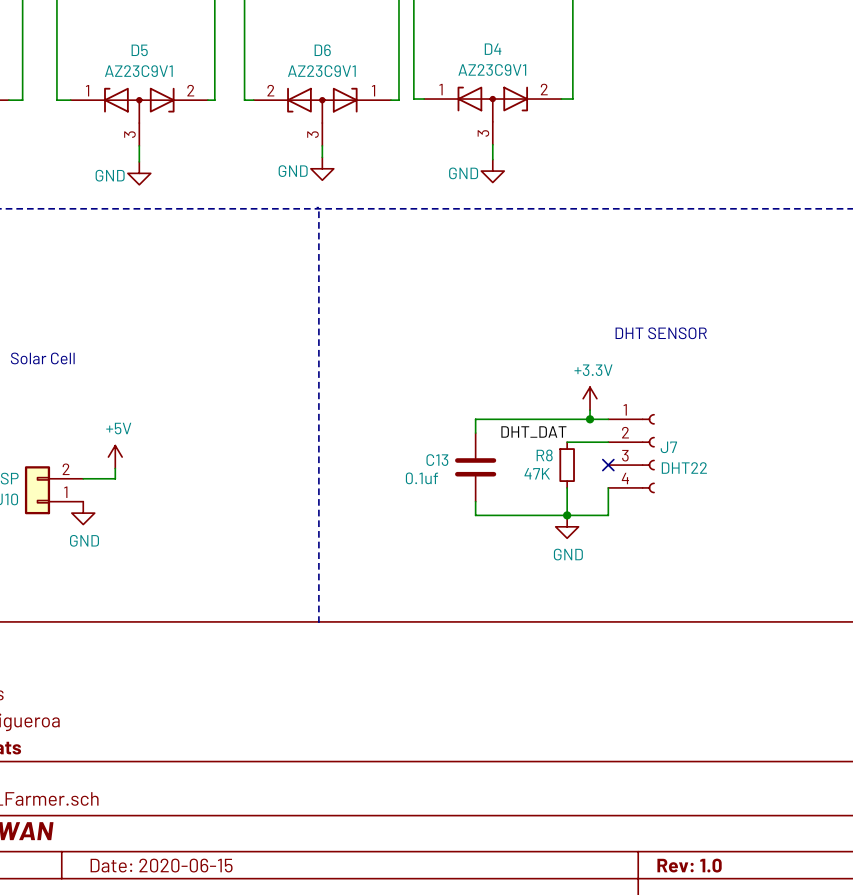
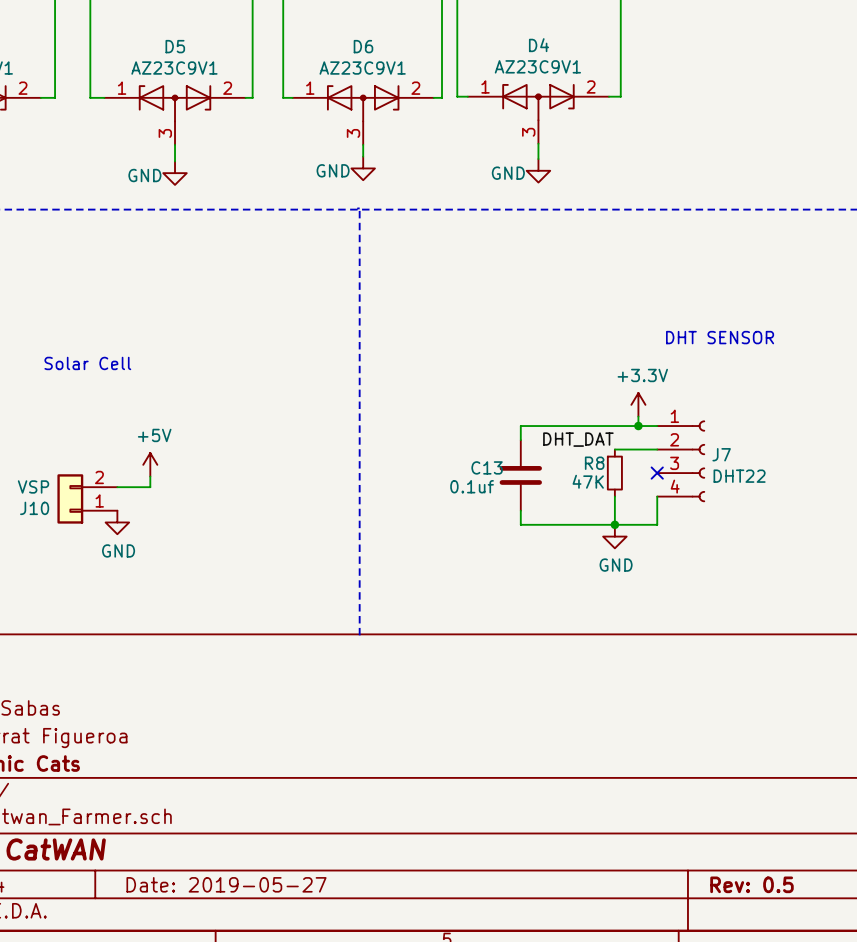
D6 flip: as is (322, 105) -> left-right (363, 103)
title block: Date: 2020-06-15 (161, 865) -> Date: 2019-05-27 (226, 884)
title block: Rev: 1.0 (689, 865) -> Rev: 0.5 (751, 884)

